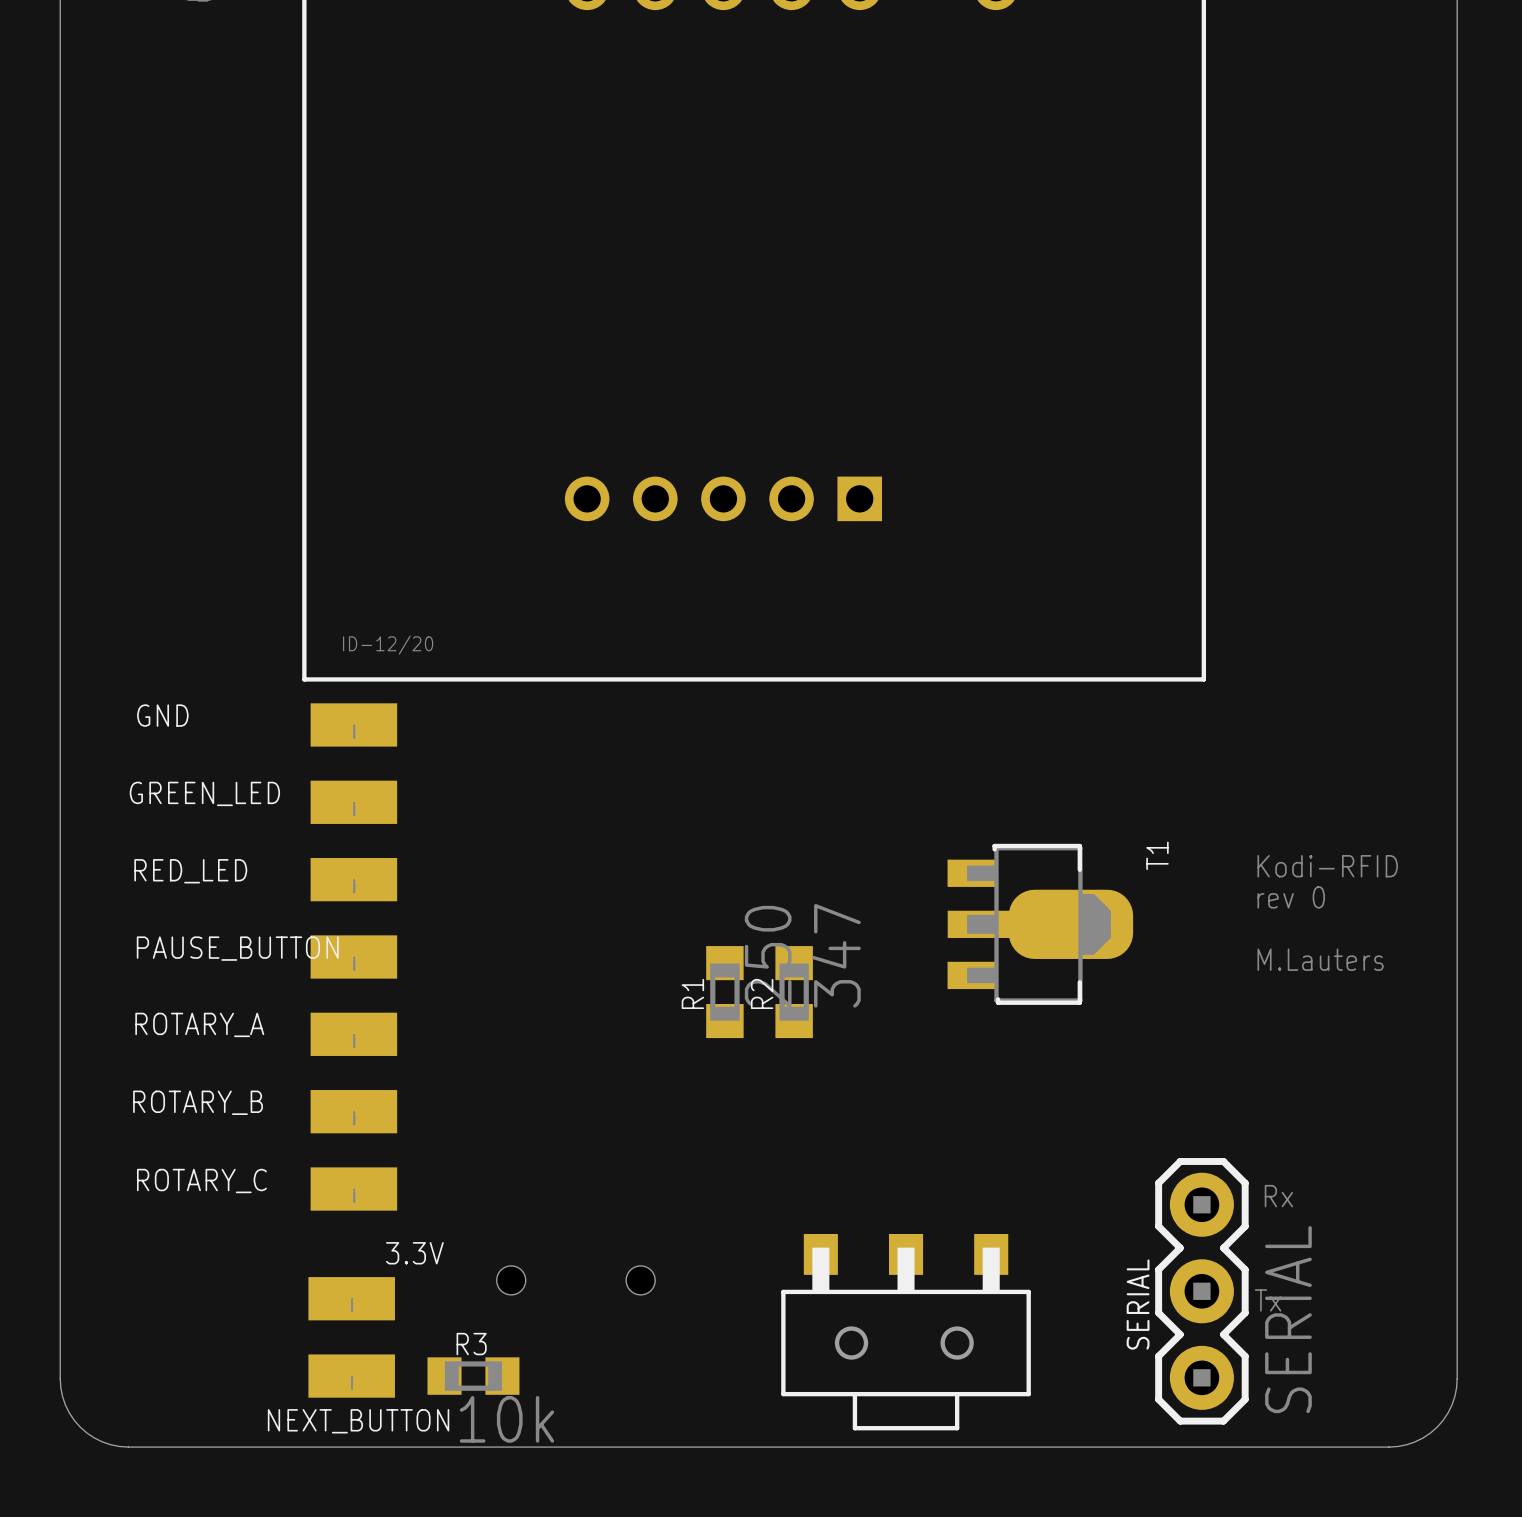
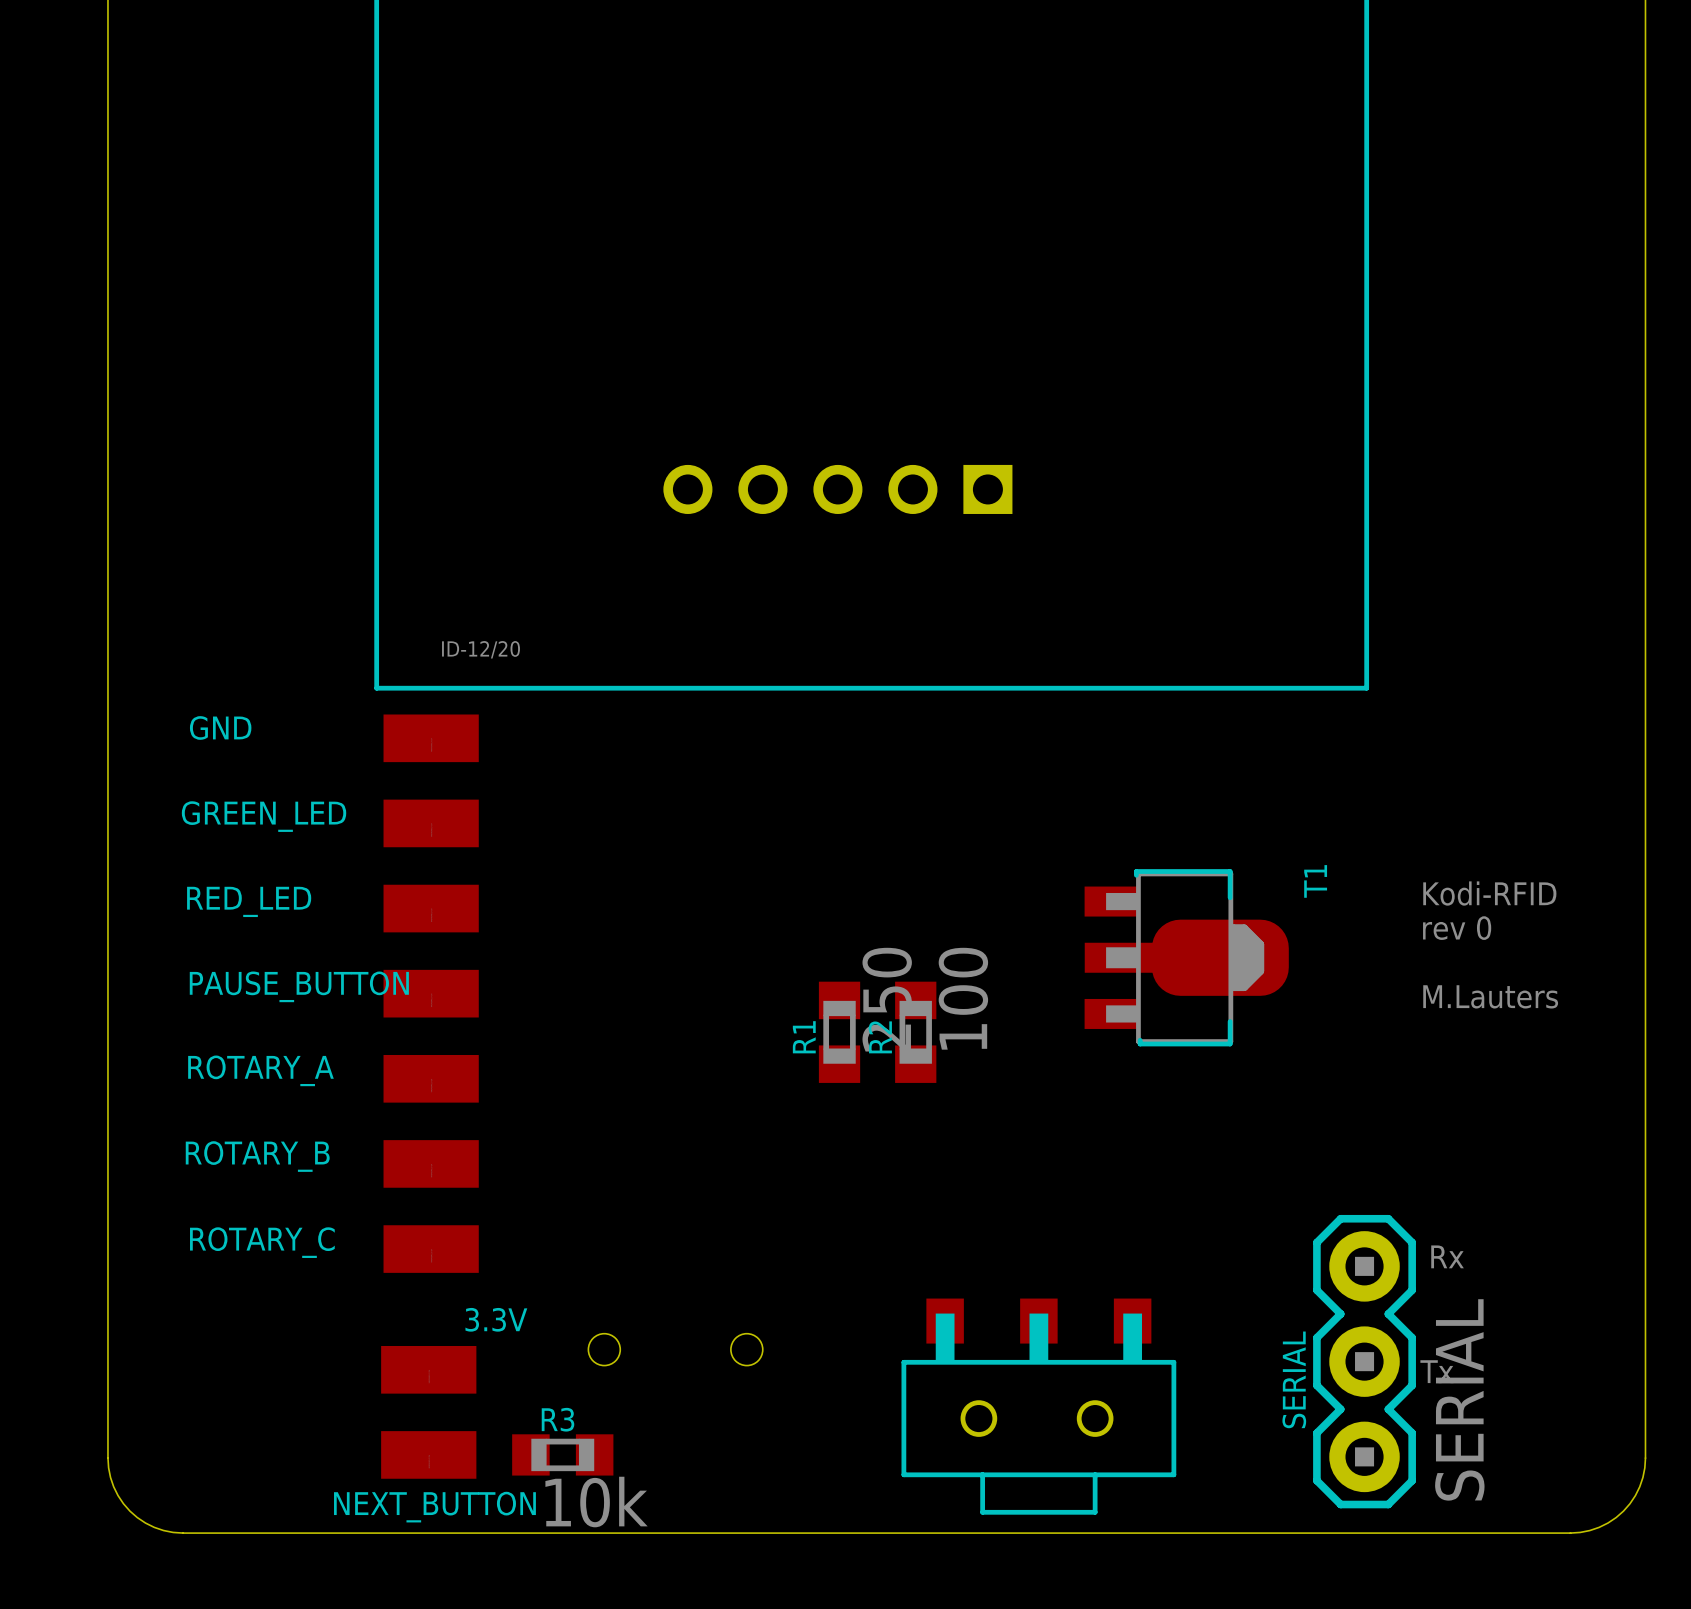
R2 value: 347 (836, 955) -> 100 (963, 998)

